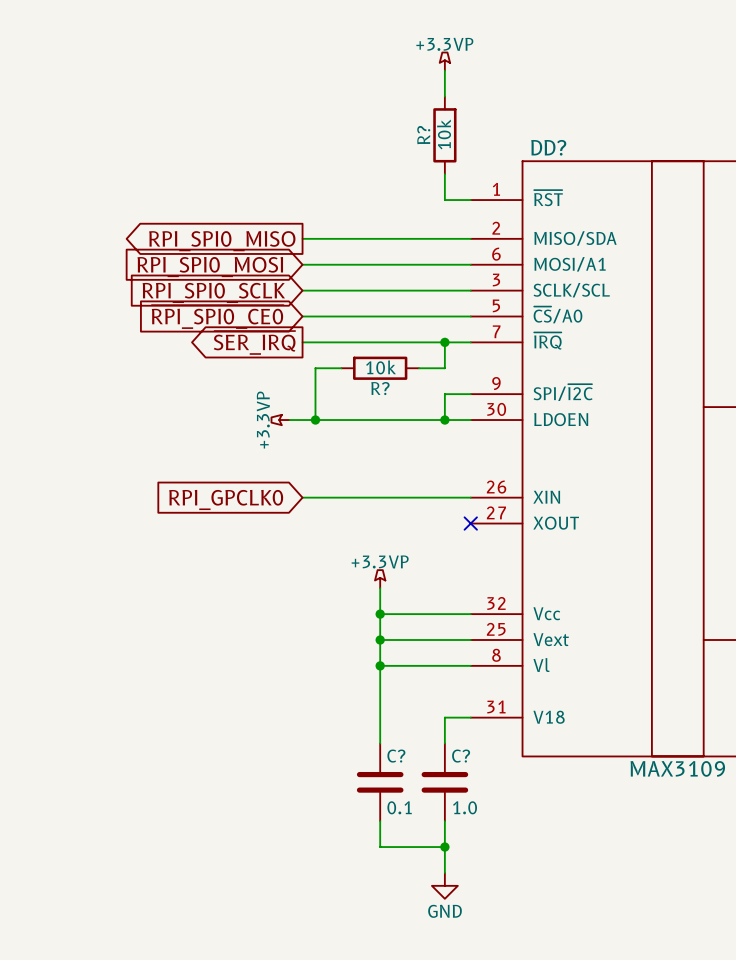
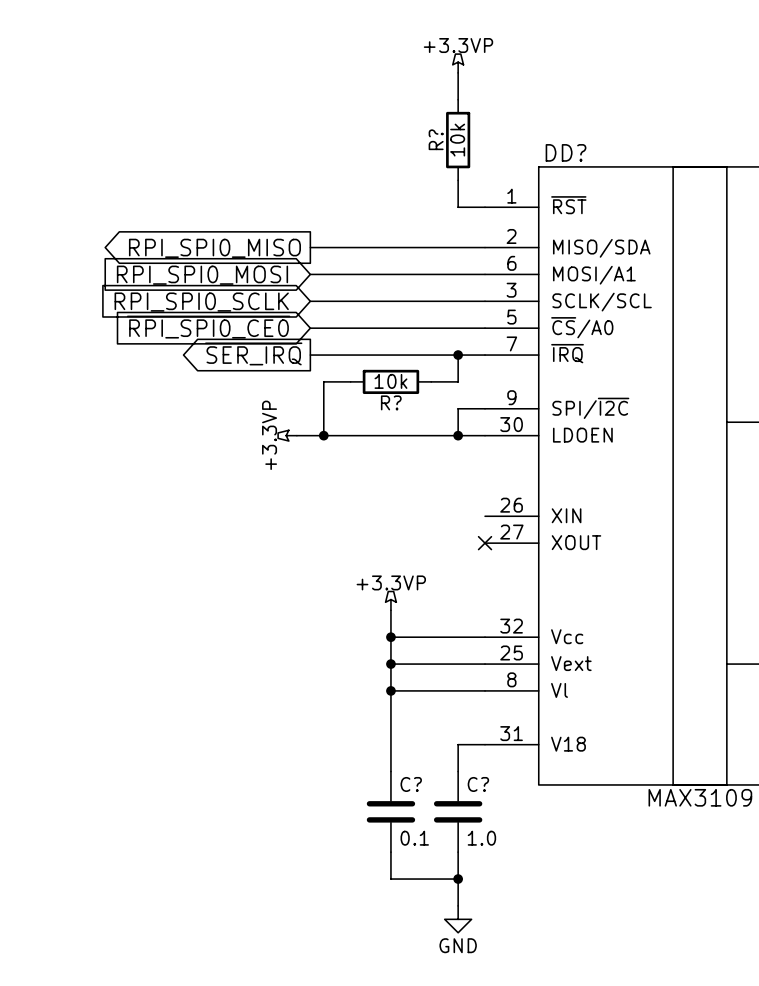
wire: (302, 497) (470, 497) -> none
global label: RPI_GPCLK0 (226, 499) -> none

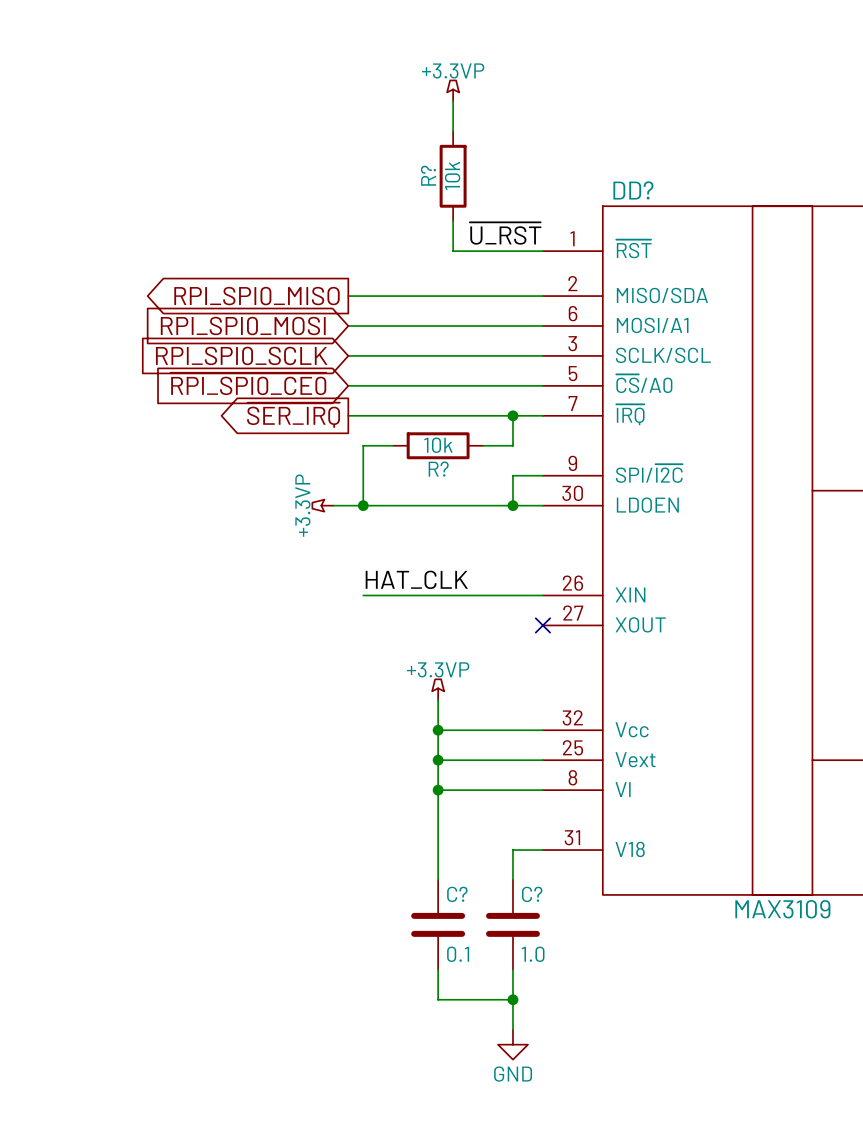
power symbol position: +3.3VP (458, 63) -> +3.3VP (453, 90)
wire: (458, 72) (458, 99) -> (453, 101) (453, 131)
R? position: (458, 140) -> (453, 176)
wire: (458, 180) (458, 207) -> (453, 221) (453, 251) (512, 251)
label: none -> ~{U_RST} (505, 233)
label: none -> HAT_CLK (416, 579)
wire: none -> (363, 595) (542, 595)

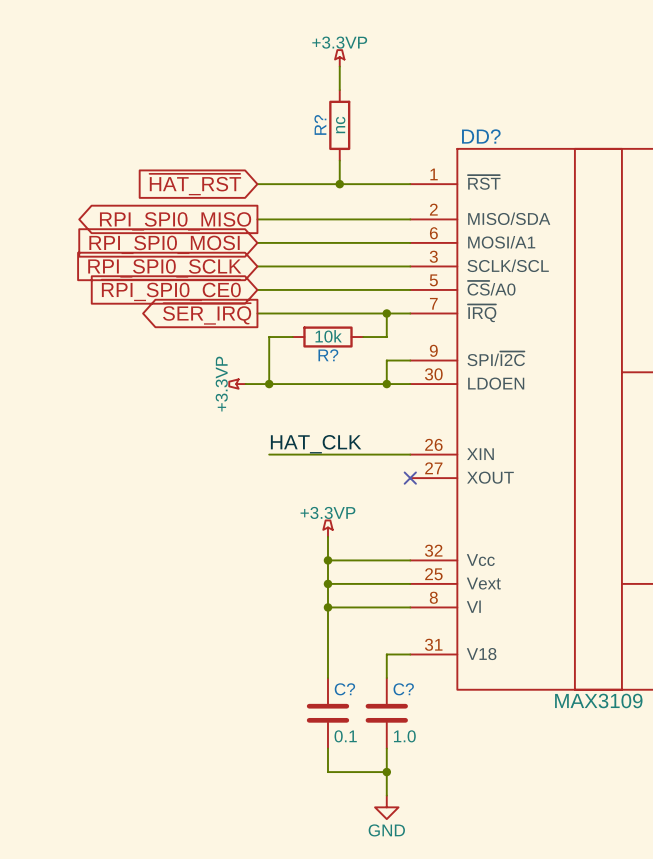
R? value: 10k (452, 175) -> nc (340, 125)
label: ~{U_RST} (505, 233) -> none
global label: none -> ~{HAT_RST} (195, 184)
wire: none -> (257, 184) (339, 184)
junction: none -> (339, 184)

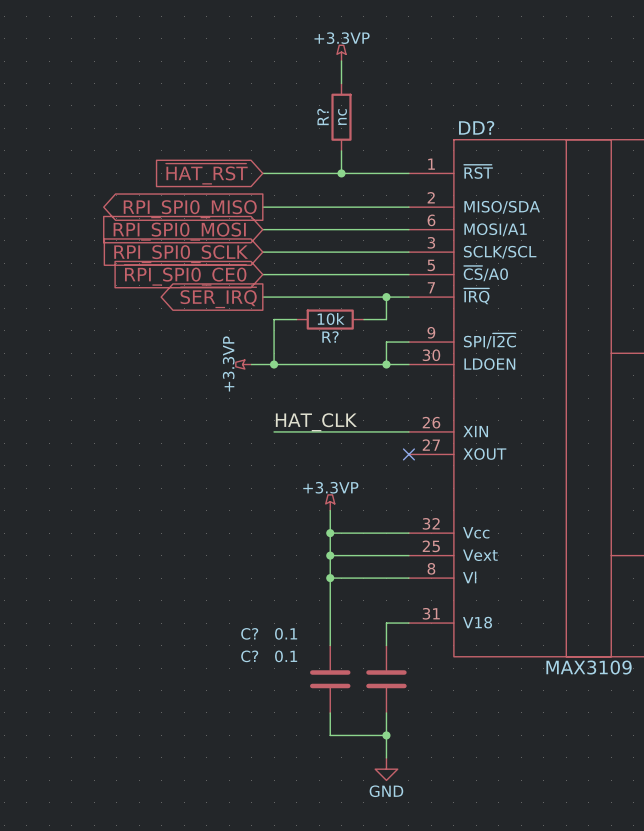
C? name position: C? (344, 689) -> C? (249, 633)
C? name position: C? (403, 689) -> C? (249, 656)
C? value position: 0.1 (345, 736) -> 0.1 (286, 633)
C? value: 1.0 (404, 736) -> 0.1 (286, 656)

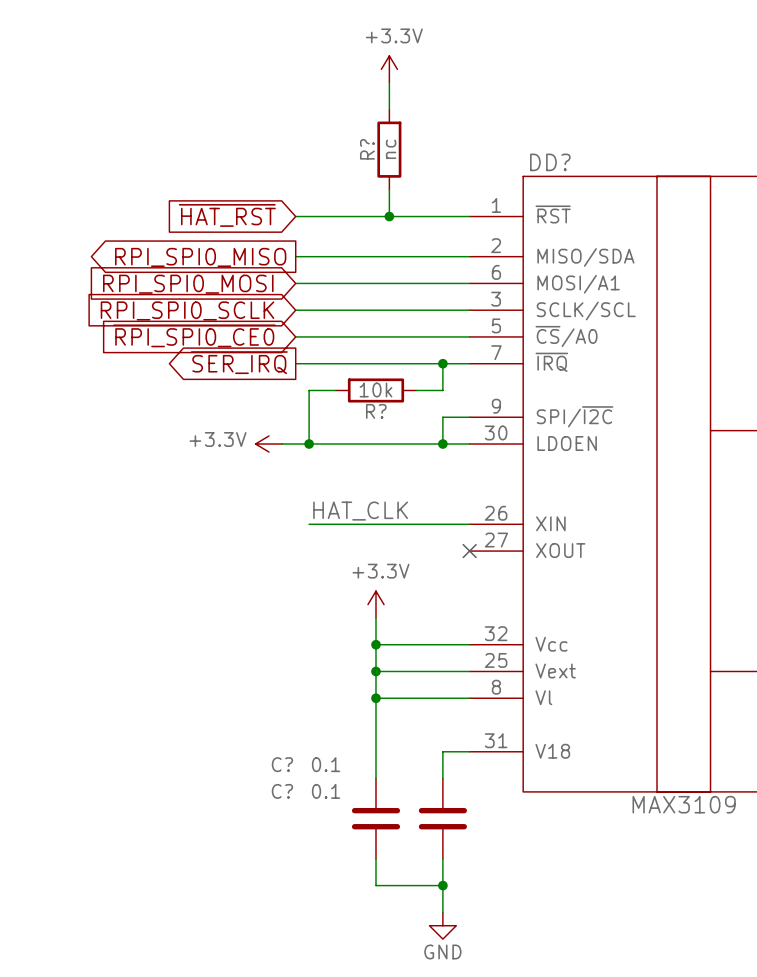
power symbol: +3.3VP (341, 53) -> +3.3V (389, 69)
power symbol: +3.3VP (243, 364) -> +3.3V (268, 444)
power symbol: +3.3VP (330, 502) -> +3.3V (375, 604)

